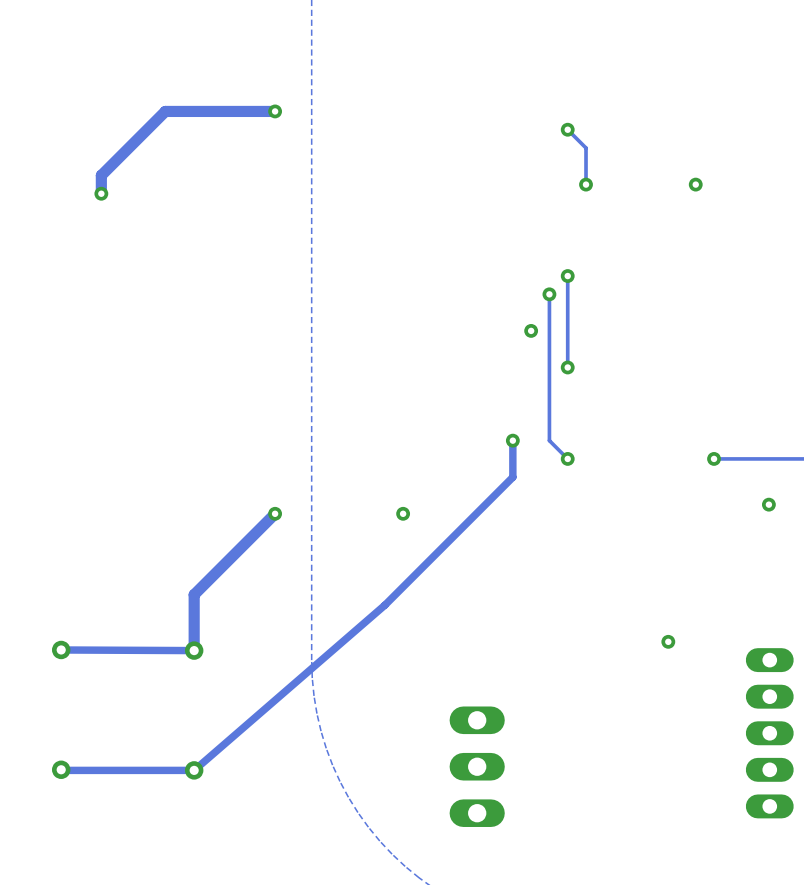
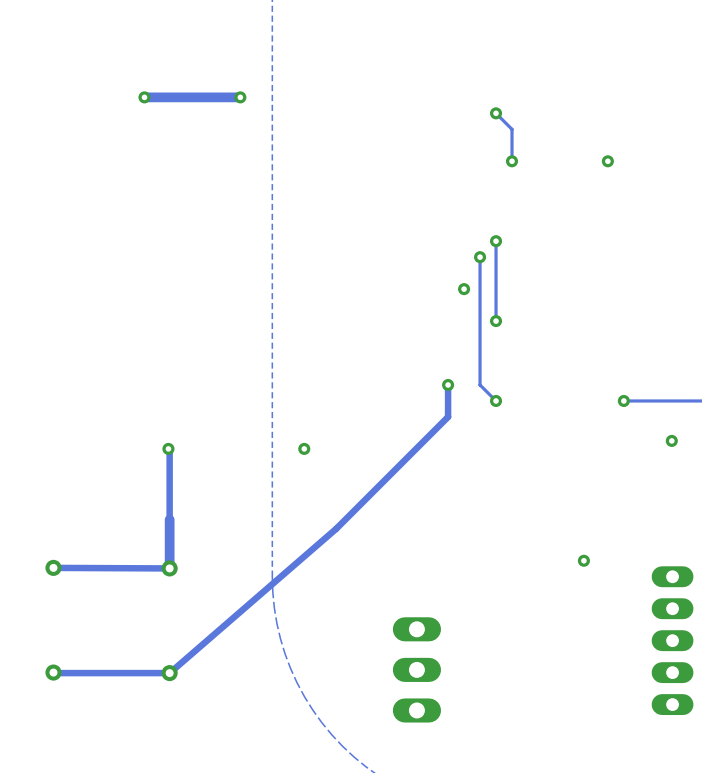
track: (165, 111) (101, 175) (101, 193) -> none
via position: (101, 193) -> (144, 97)
via: none -> (168, 448)
track: (275, 513) (194, 594) -> (168, 448) (169, 519)
via: (275, 513) -> none
via: none -> (304, 448)
via: (403, 513) -> none

